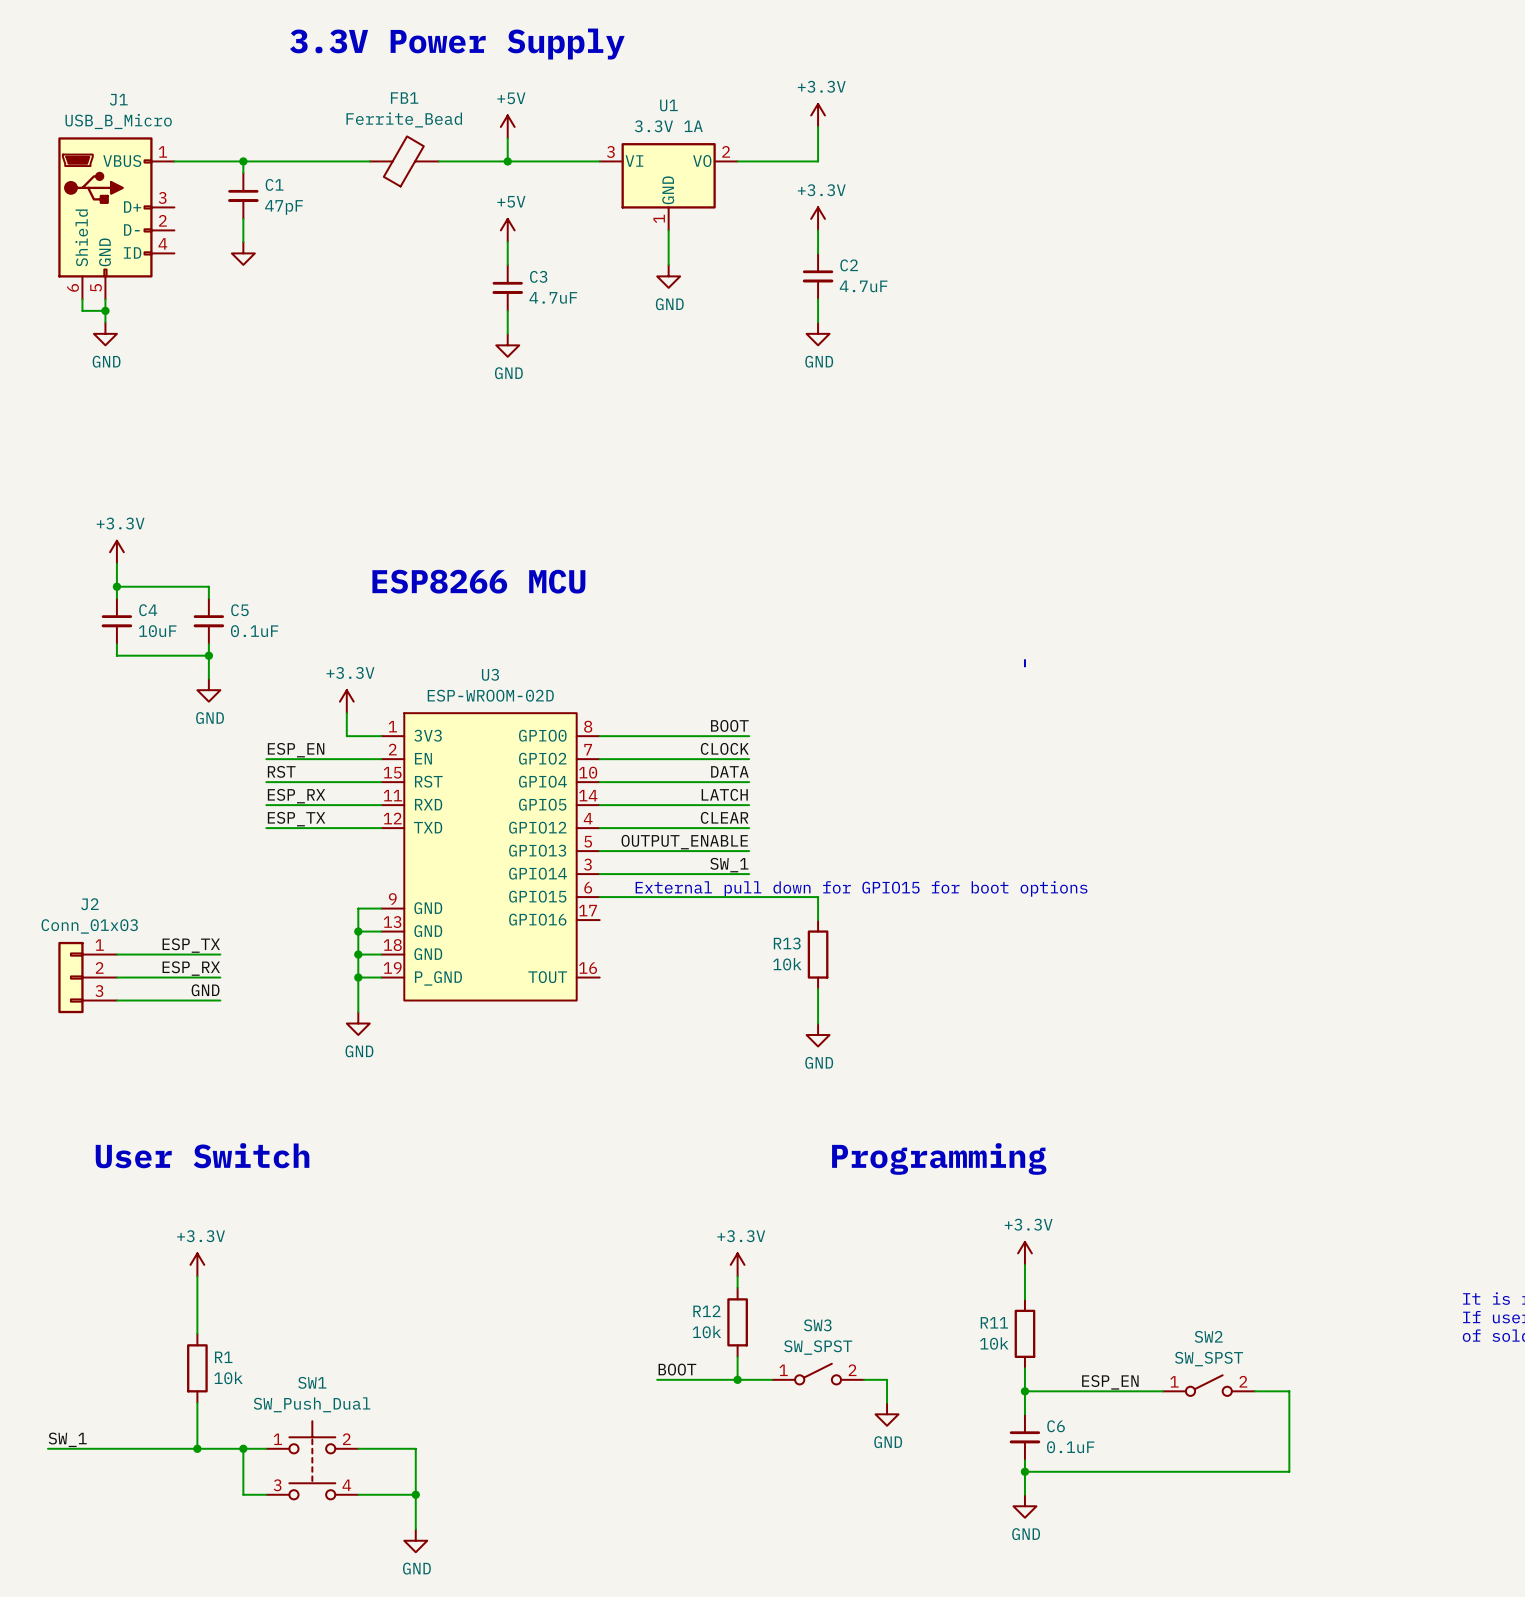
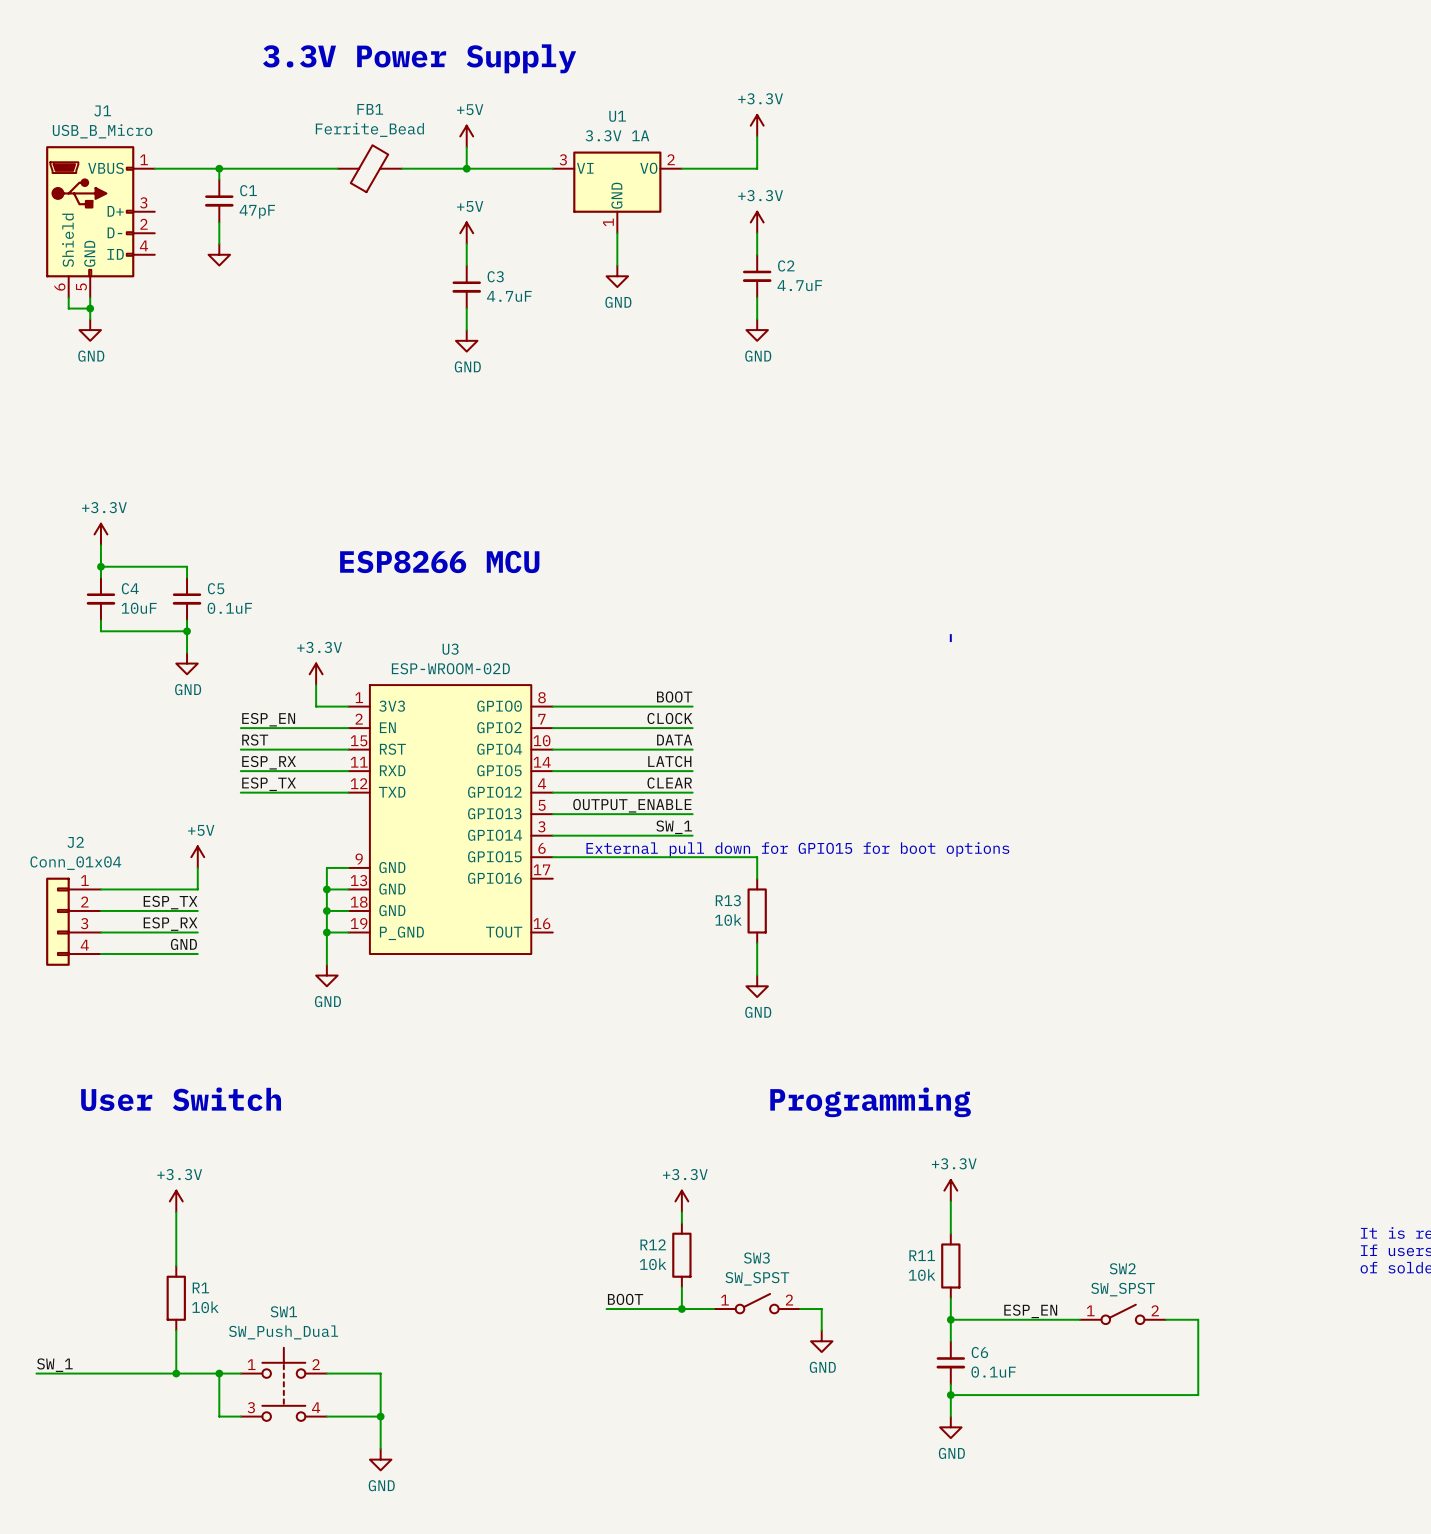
power symbol: none -> +5V (197, 857)
wire: none -> (197, 867) (197, 889) (100, 889)
J2 value: Conn_01x03 (89, 926) -> Conn_01x04 (75, 863)
J2 symbol: [58, 941, 117, 1014] -> [46, 877, 101, 966]

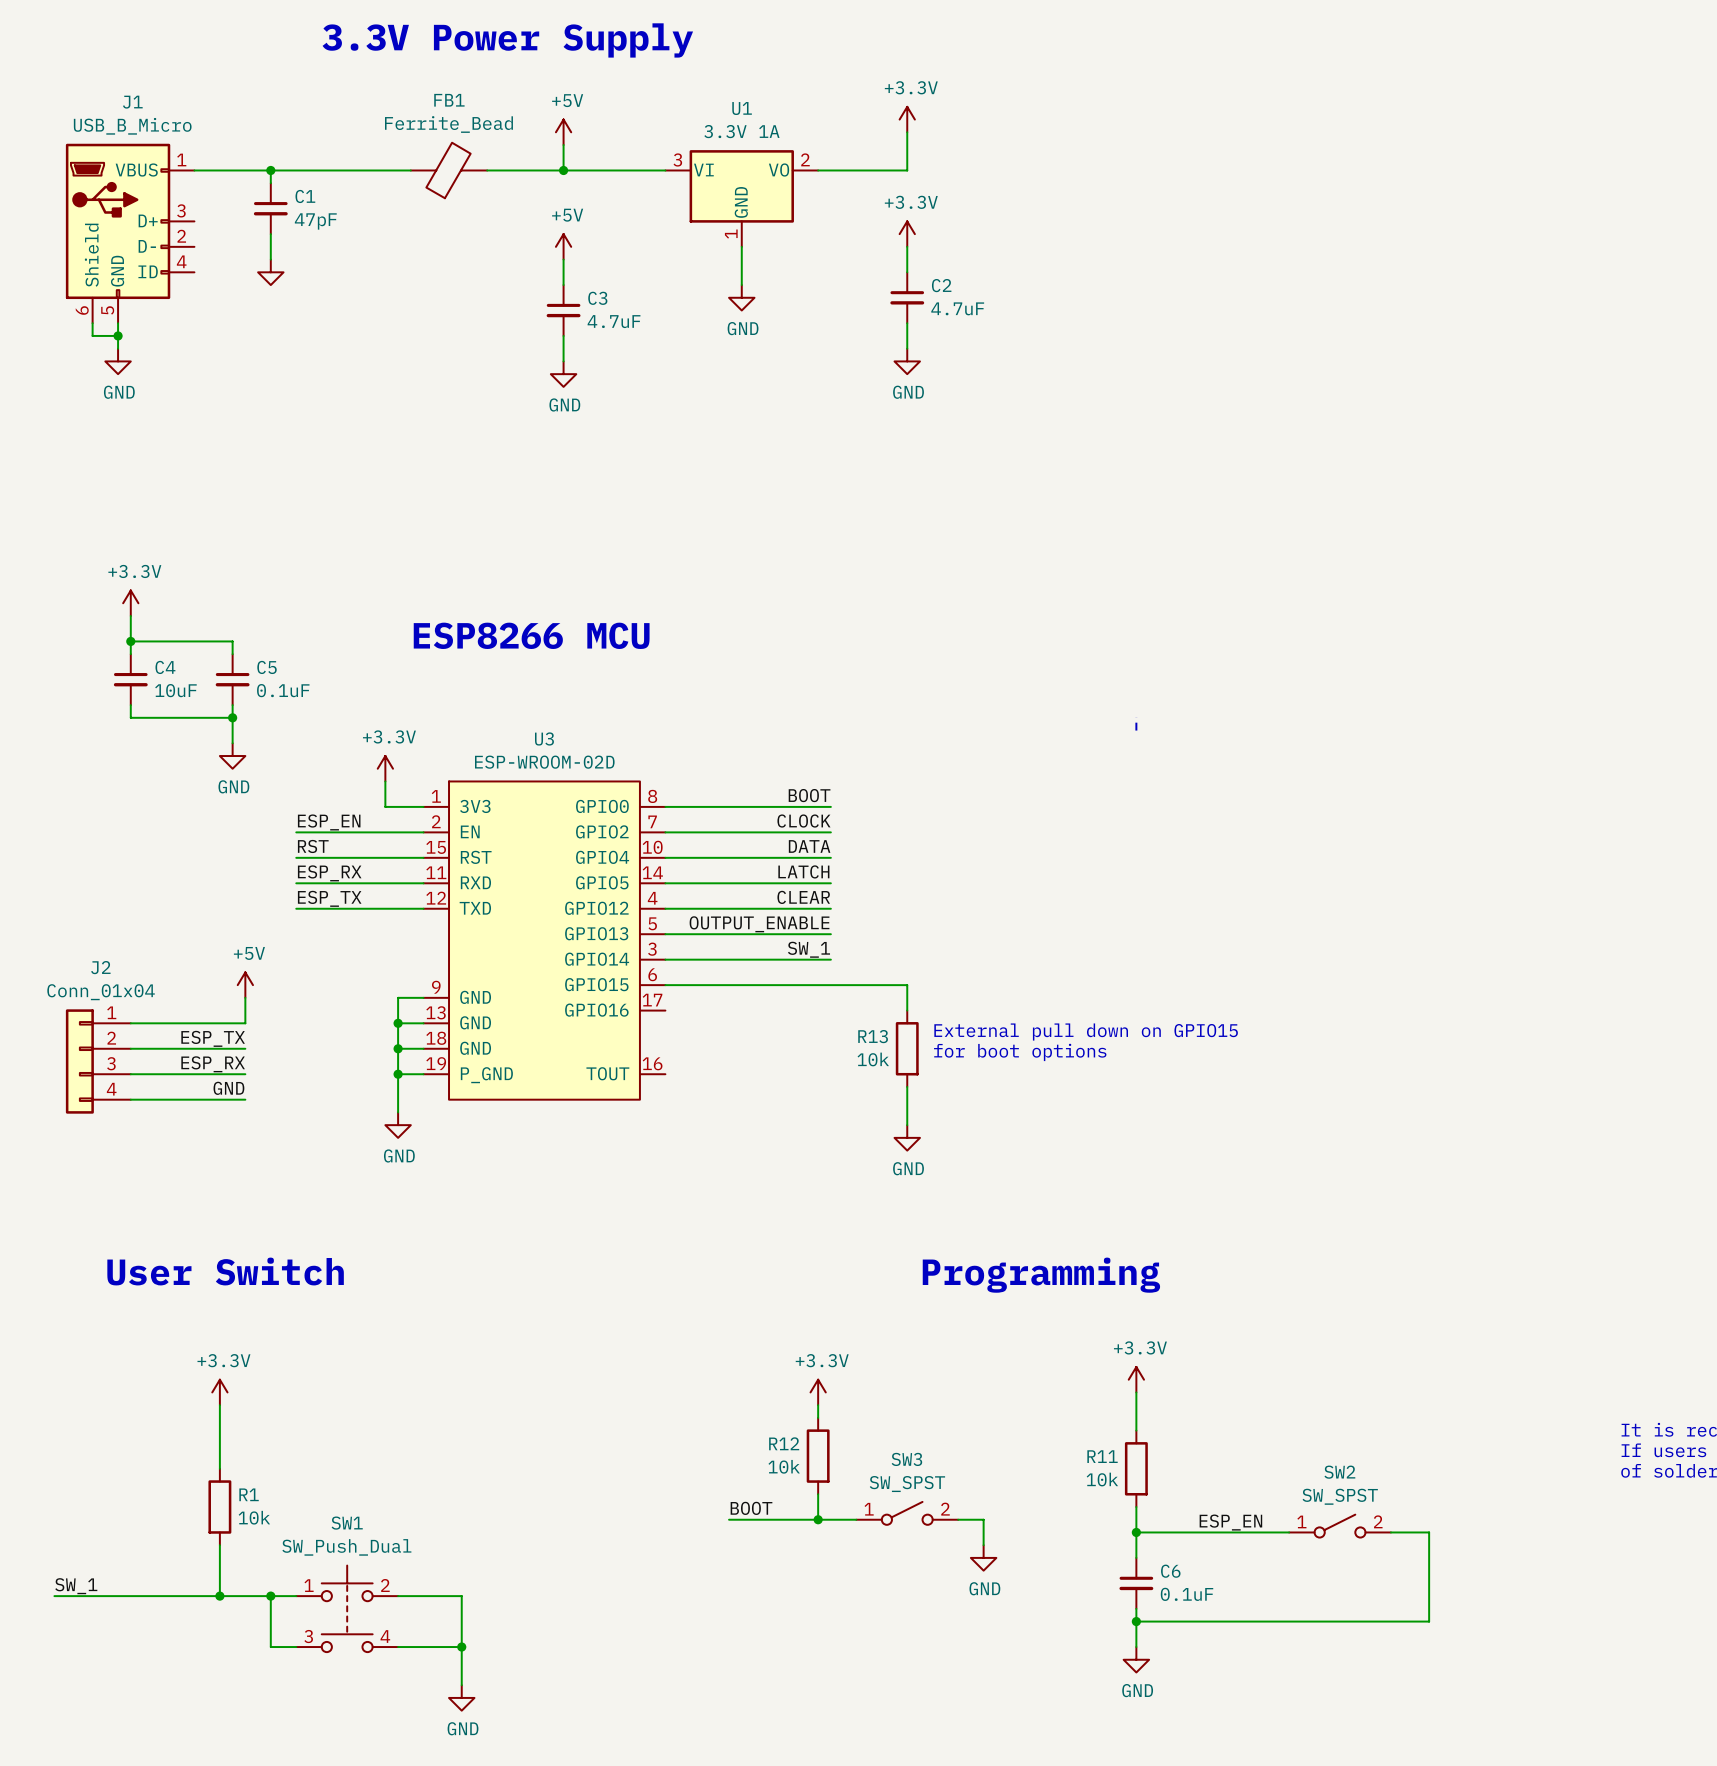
text: External pull down for GPIO15 for boot options (797, 849) -> none
text: none -> External pull down on GPIO15 (1086, 1032)
text: none -> for boot options (1020, 1052)

